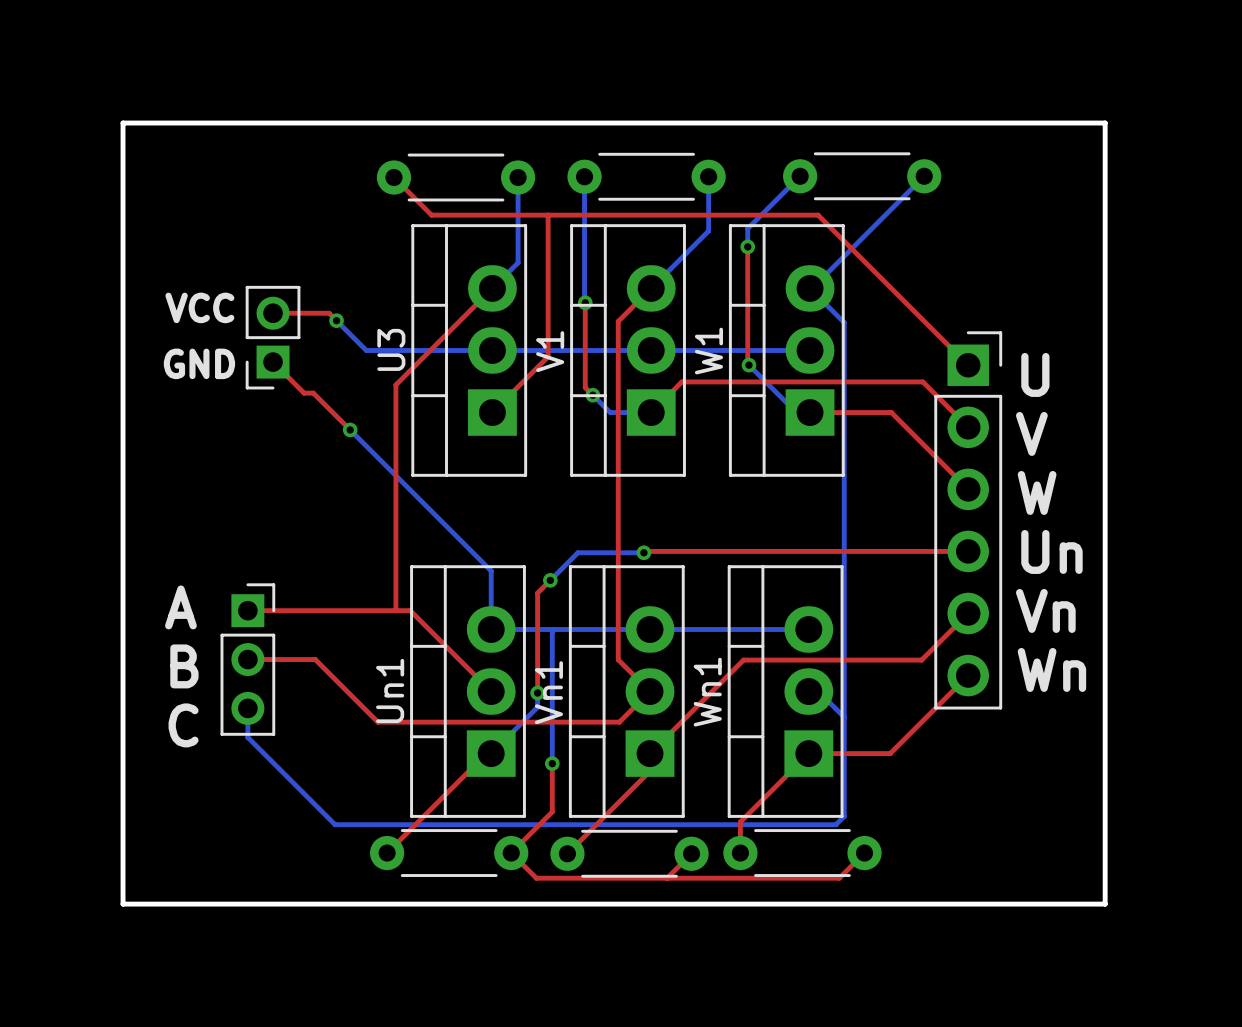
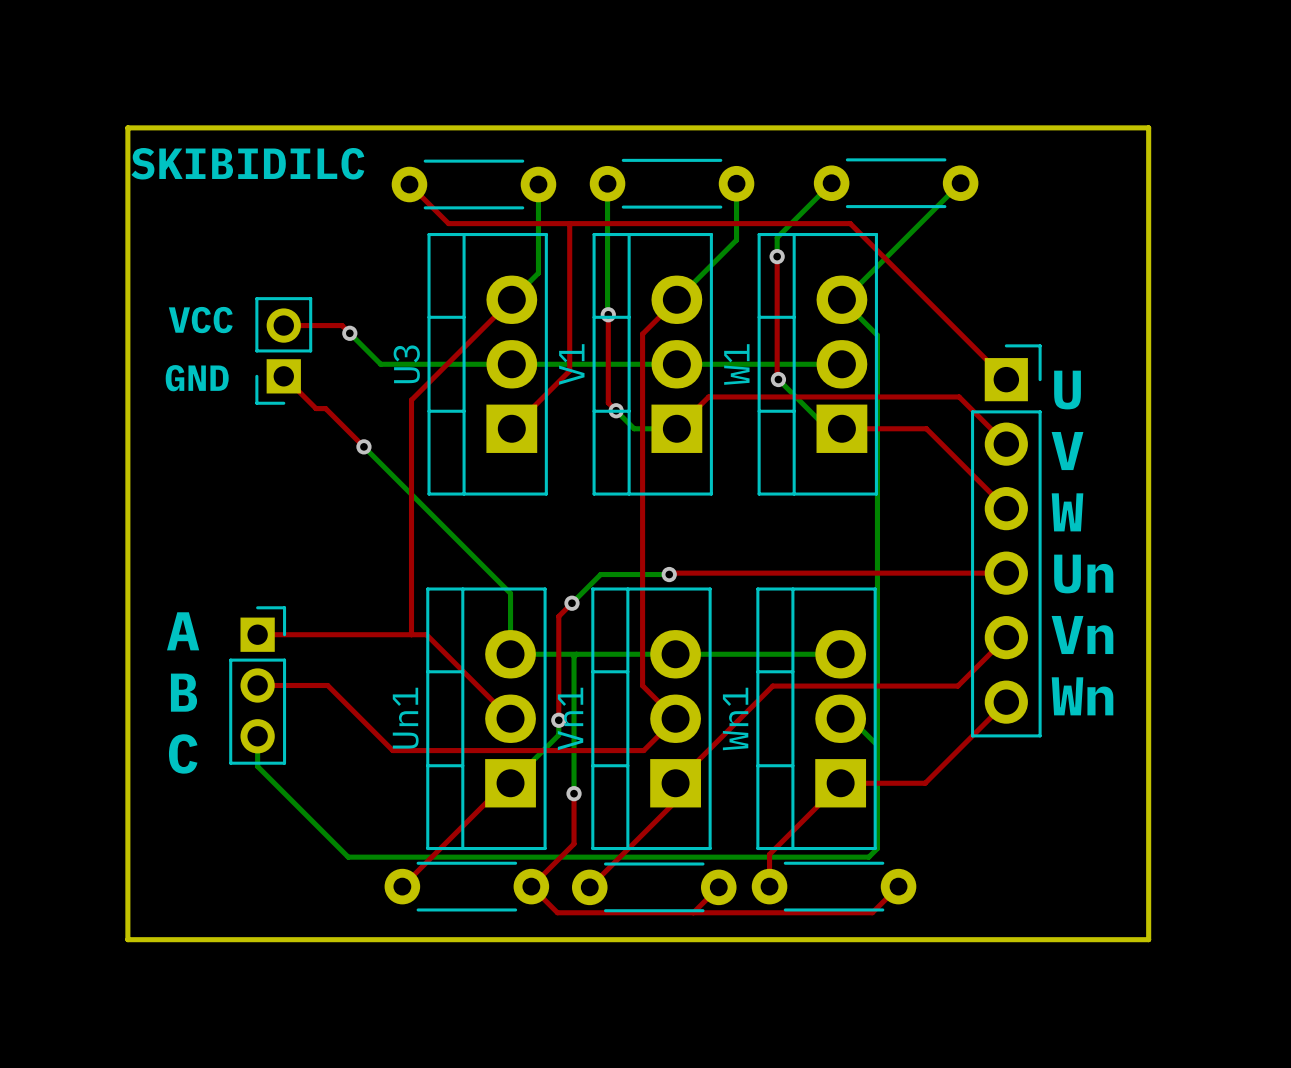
text: none -> SKIBIDILC (247, 163)

